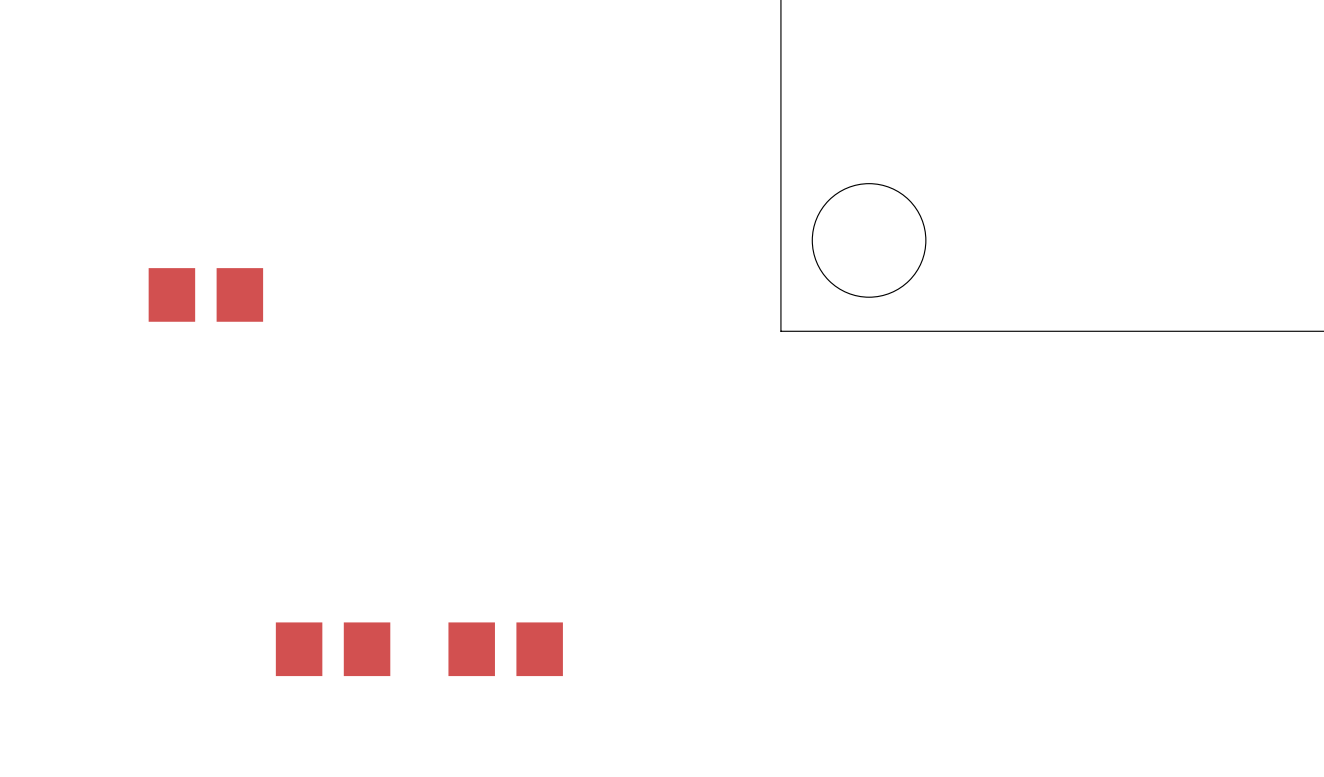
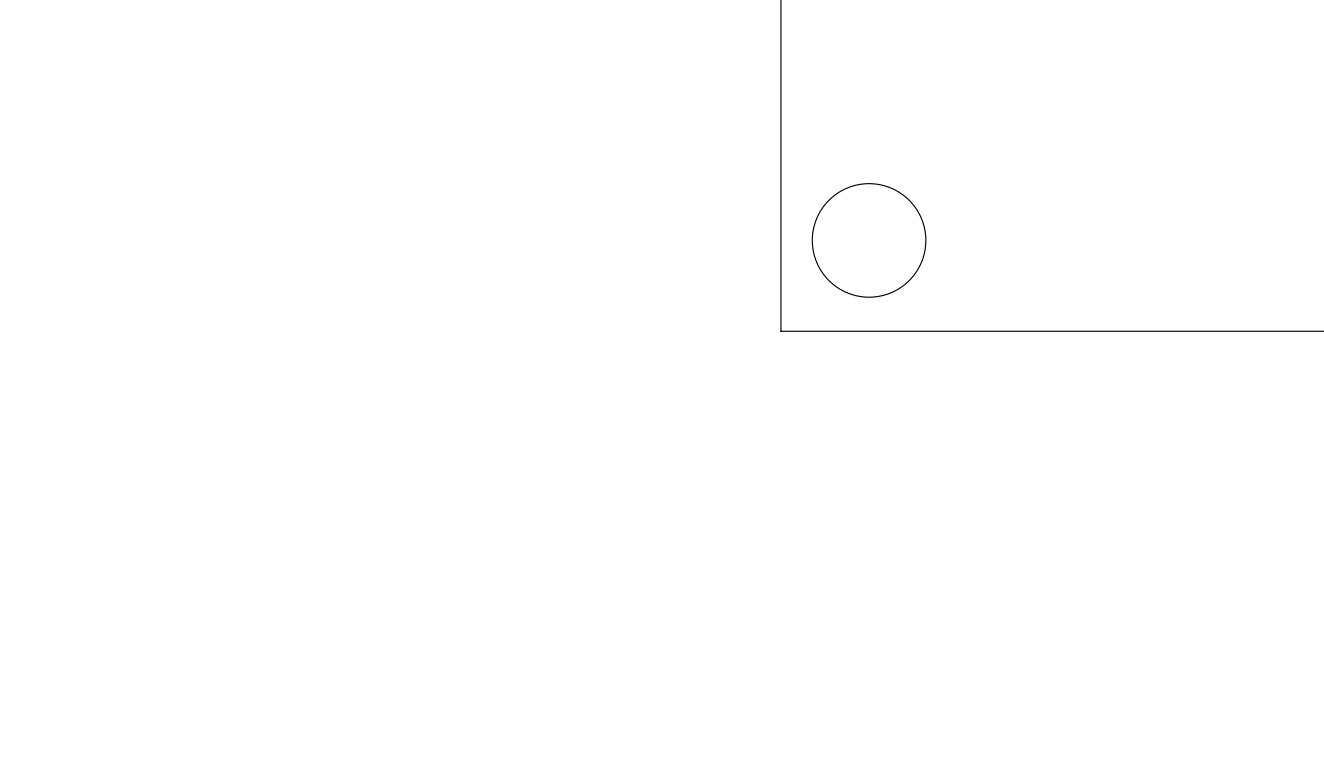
part: (205, 294) -> none
part: (333, 649) -> none
part: (505, 649) -> none

